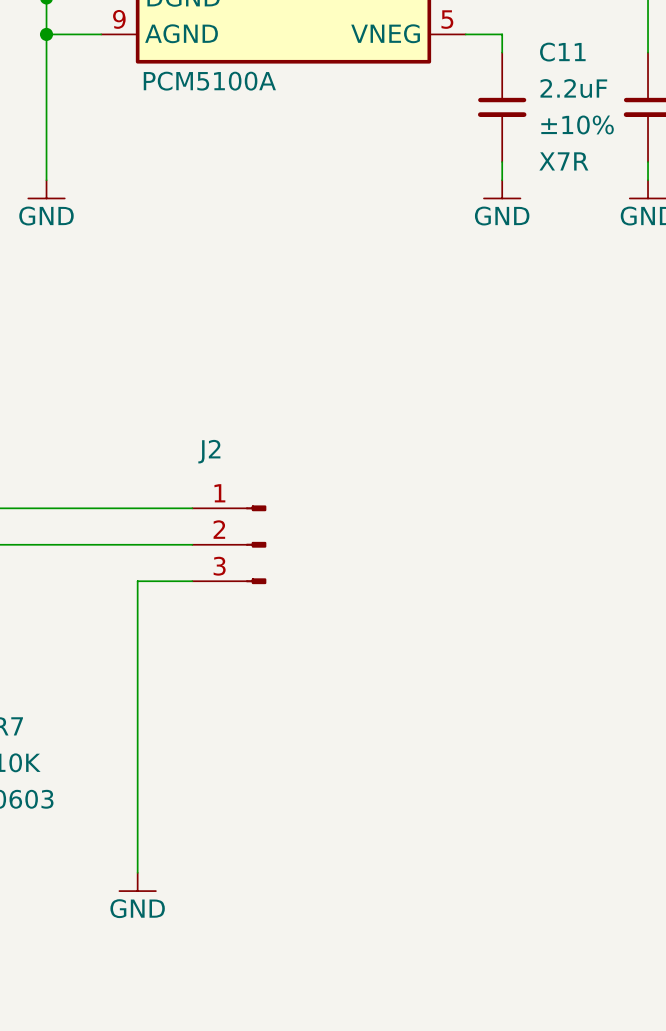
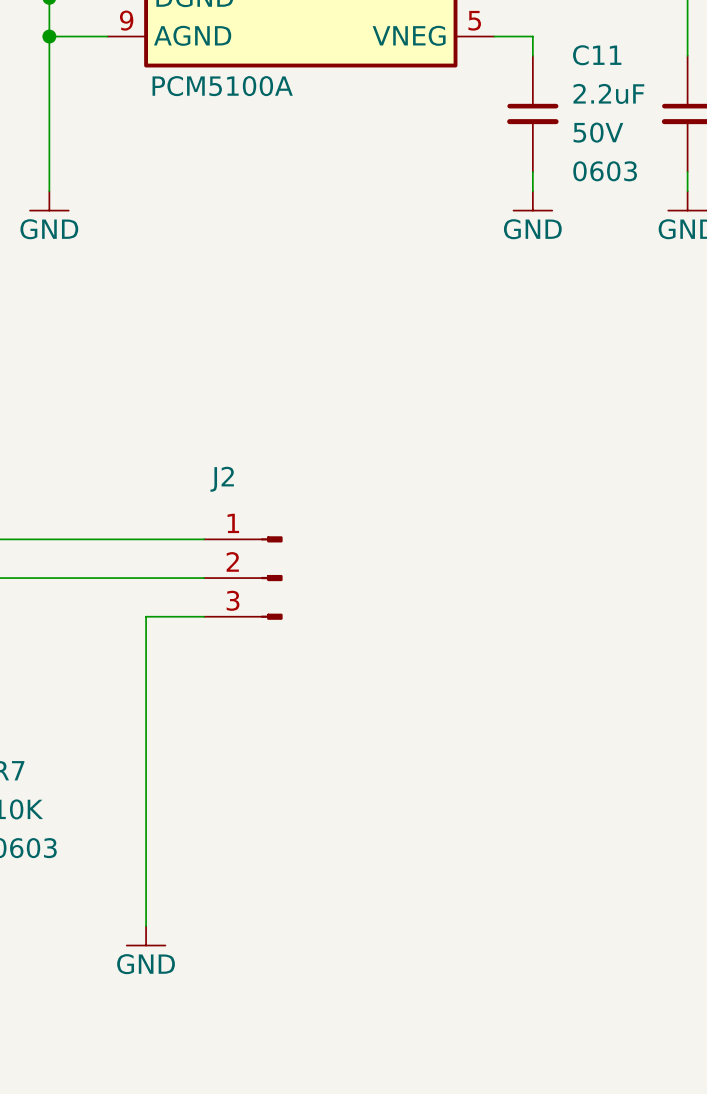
C11 text: none -> 50V (598, 132)
C11 text: ±10% (577, 124) -> none
C11 text: X7R (563, 161) -> none
C11 text: none -> 0603 (605, 171)

